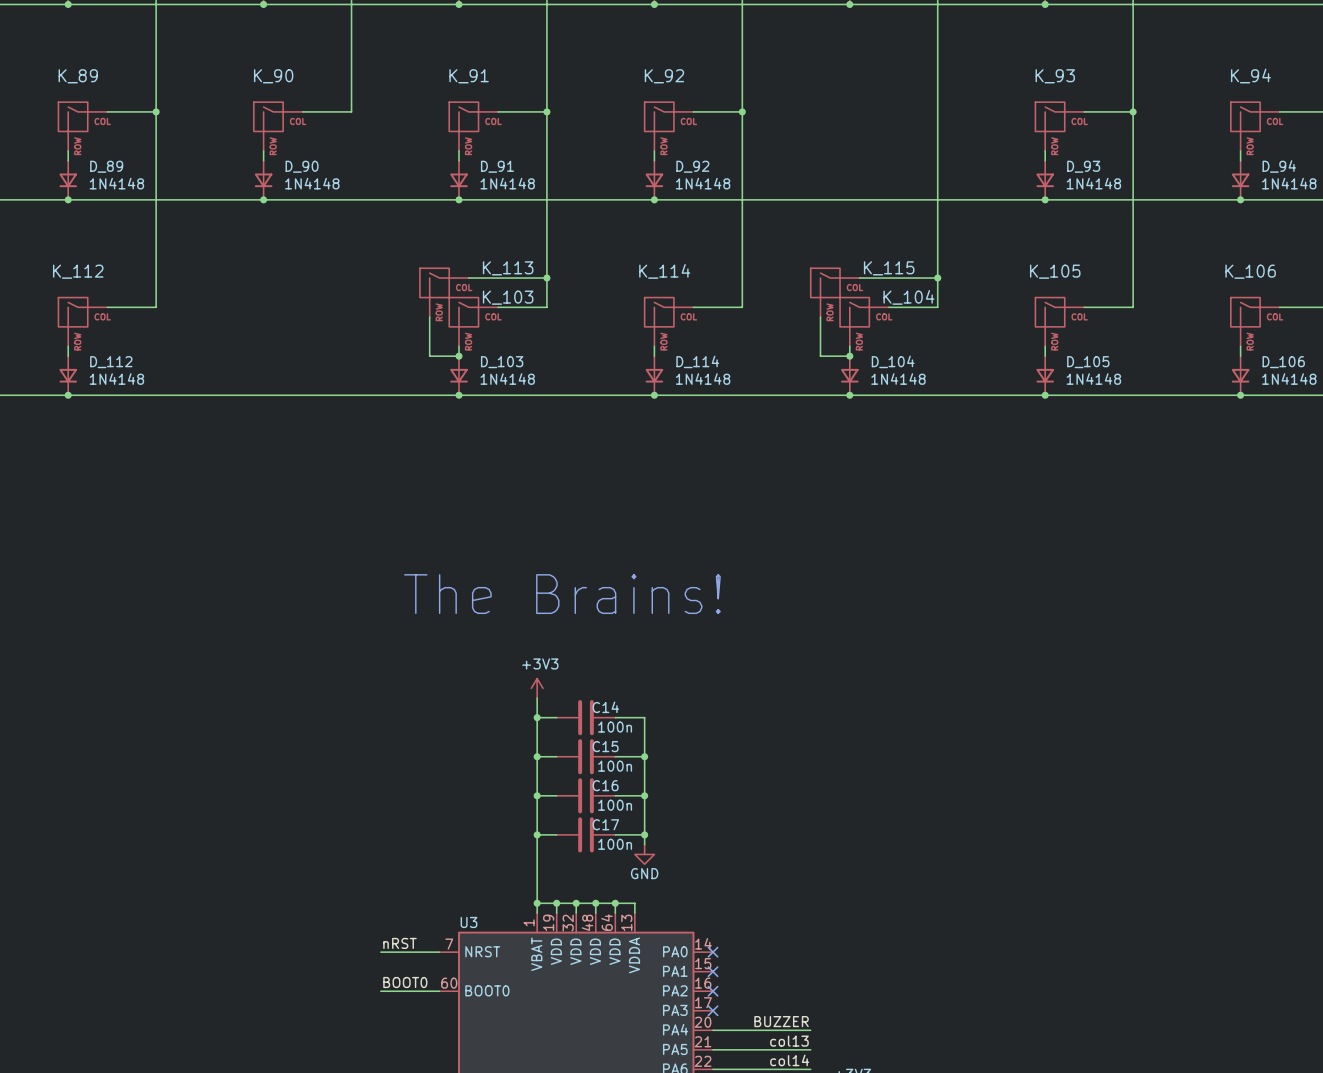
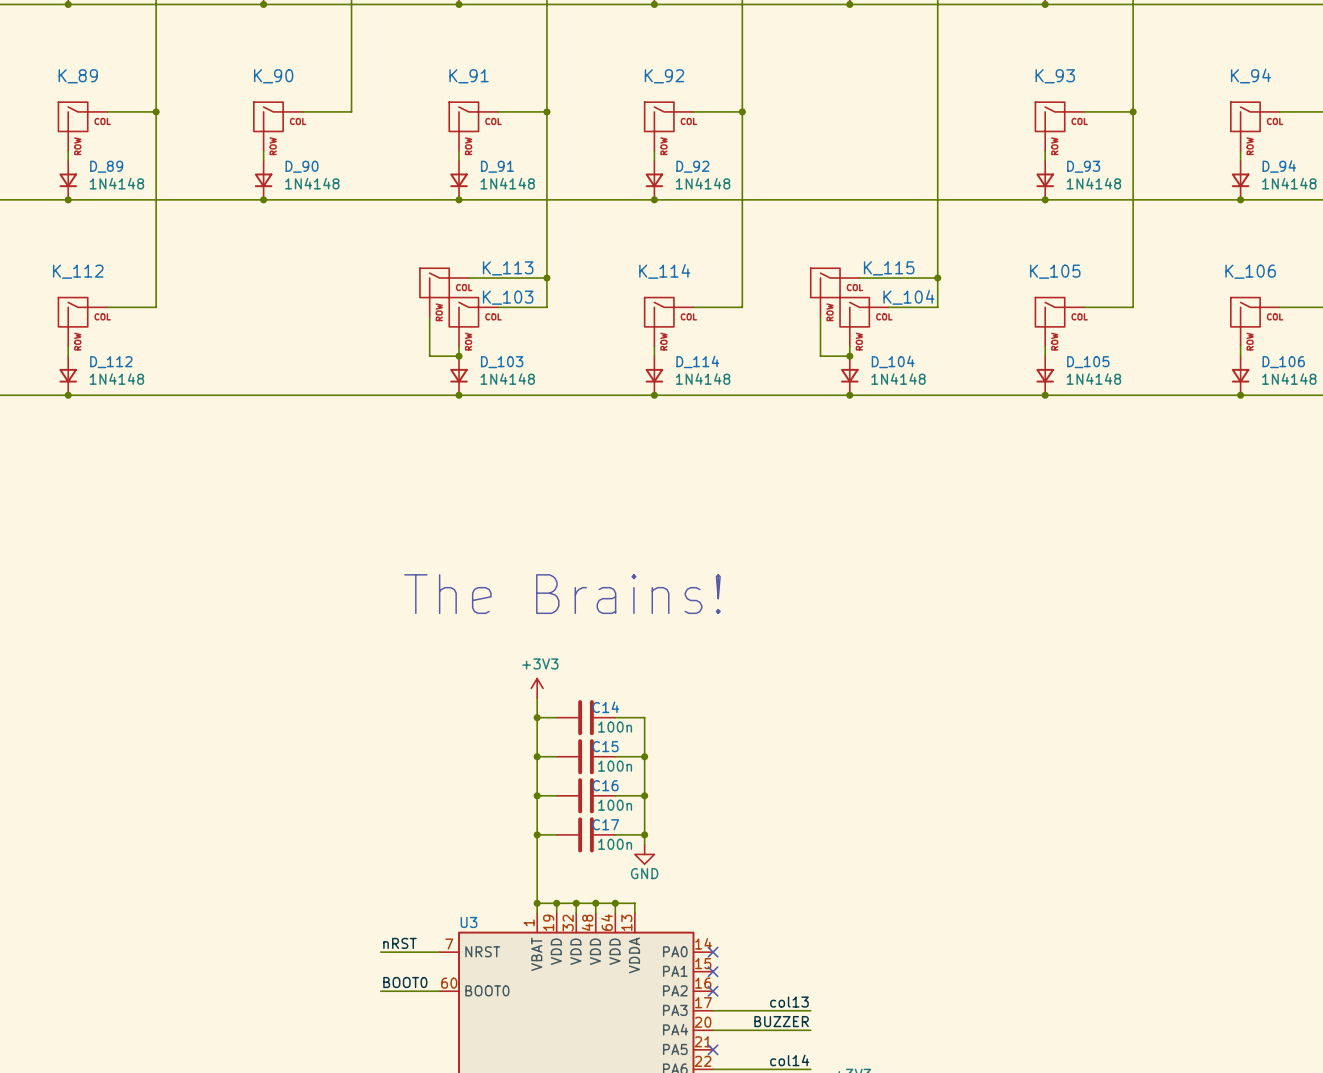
no-connect mark position: (713, 1010) -> (713, 1049)
label position: col13 (789, 1041) -> col13 (789, 1002)
wire: (713, 1049) (810, 1049) -> (713, 1010) (810, 1010)

